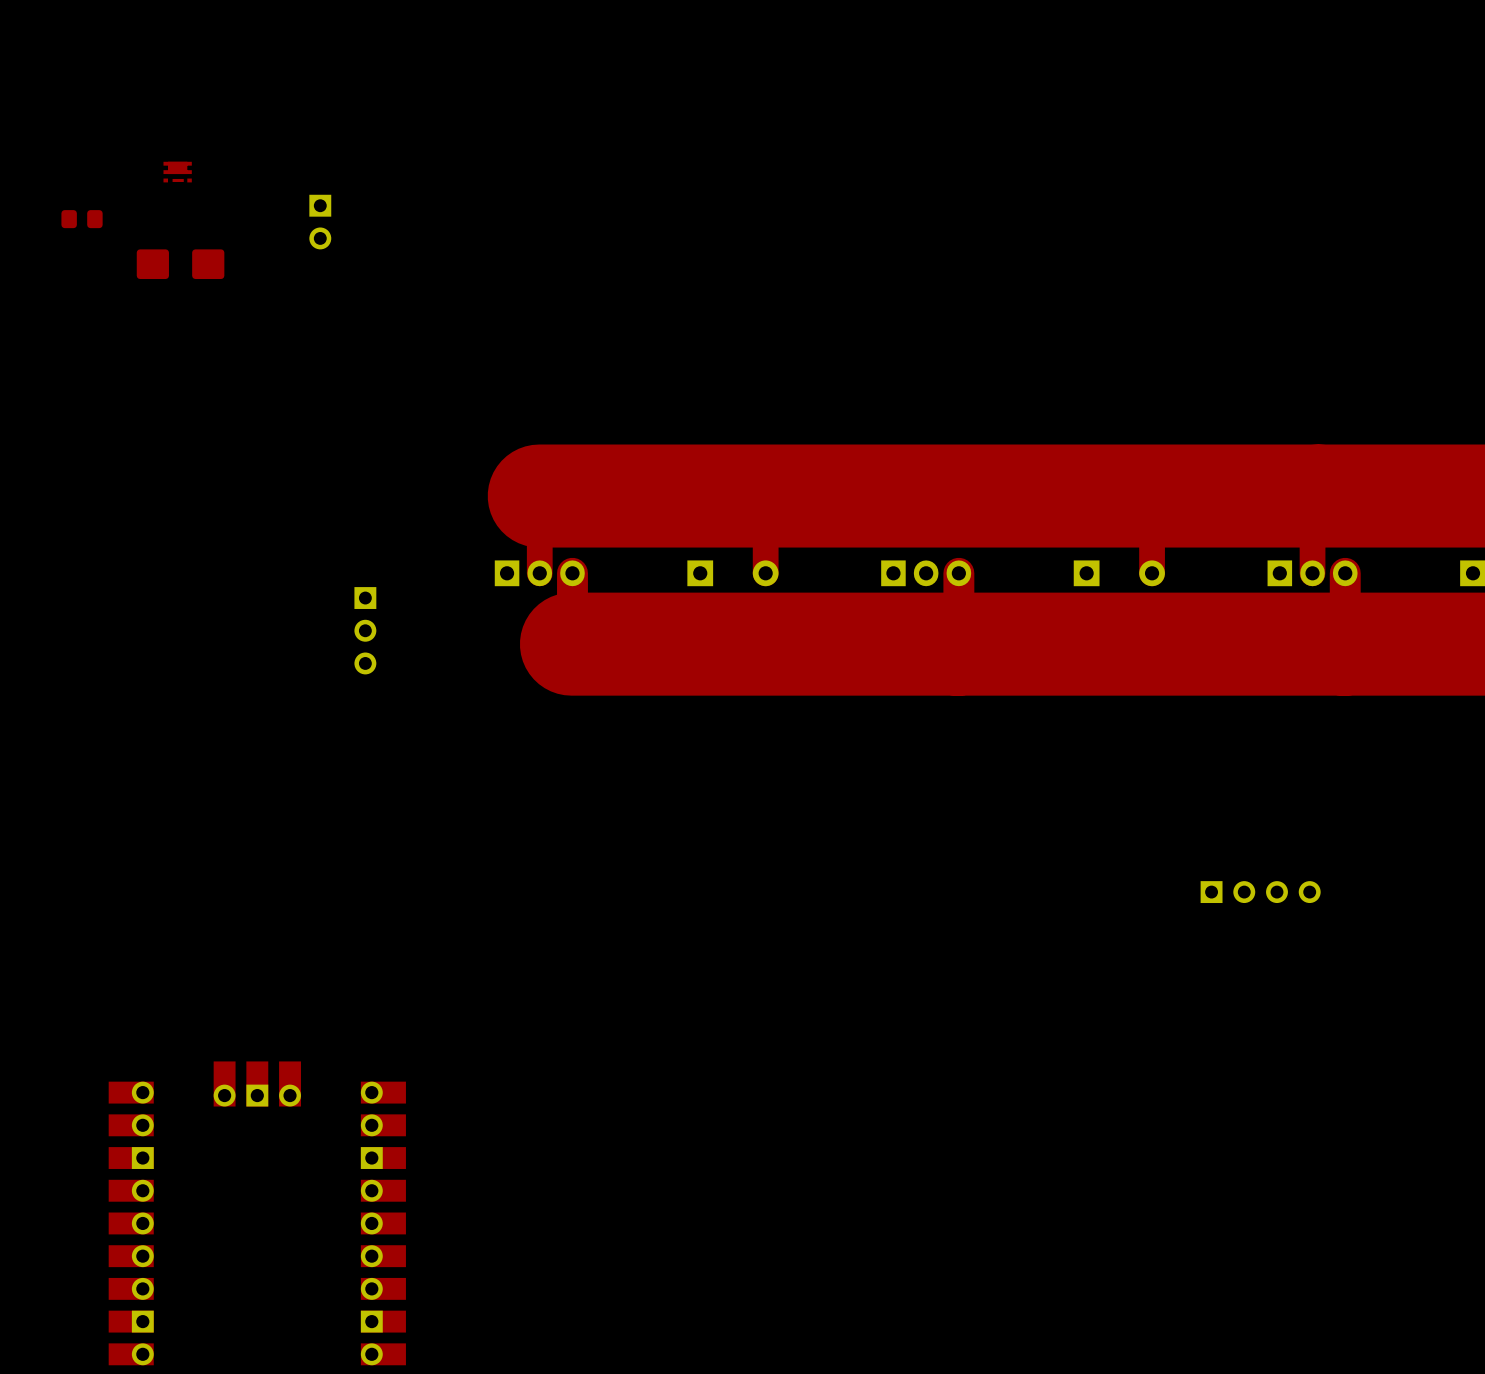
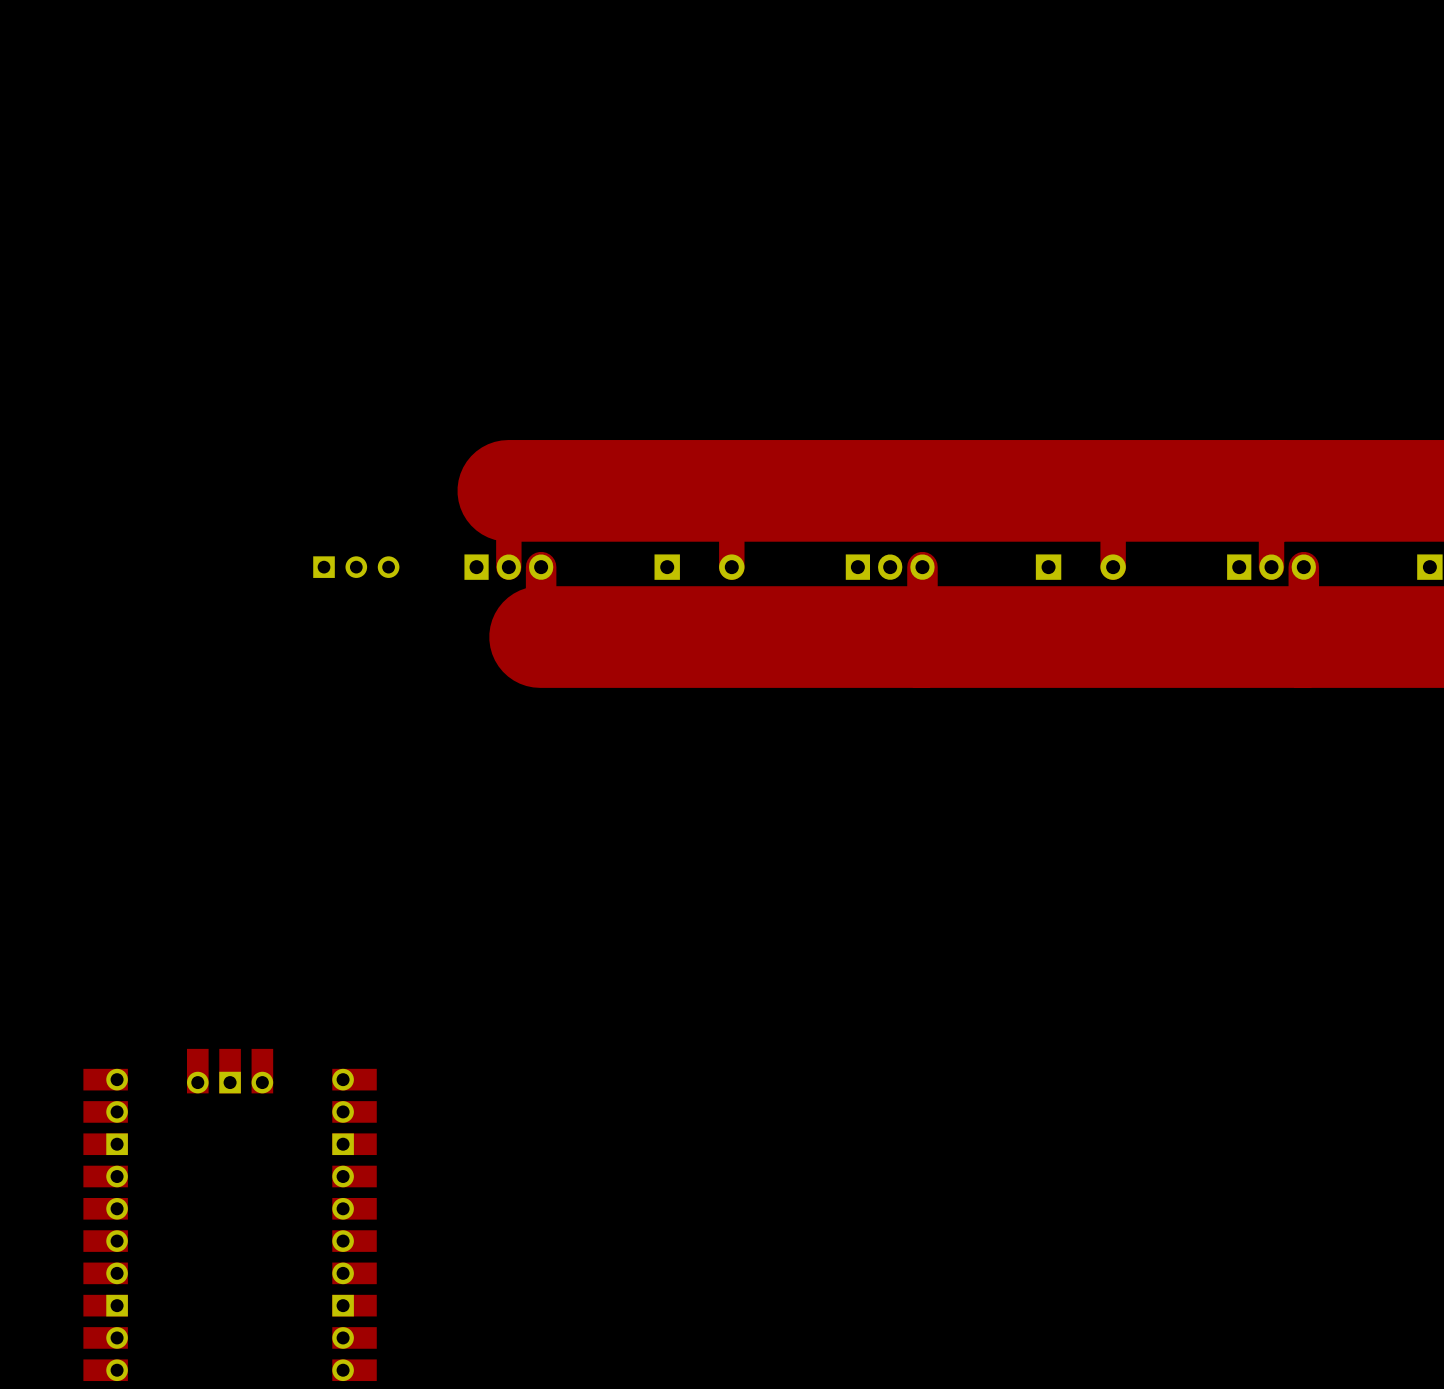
part: (177, 172) -> none
part: (82, 219) -> none
part: (320, 222) -> none
part: (180, 264) -> none
part rotation: 0° (365, 630) -> 90° counterclockwise (356, 567)
part position: (365, 630) -> (356, 567)
part: (1260, 892) -> none

